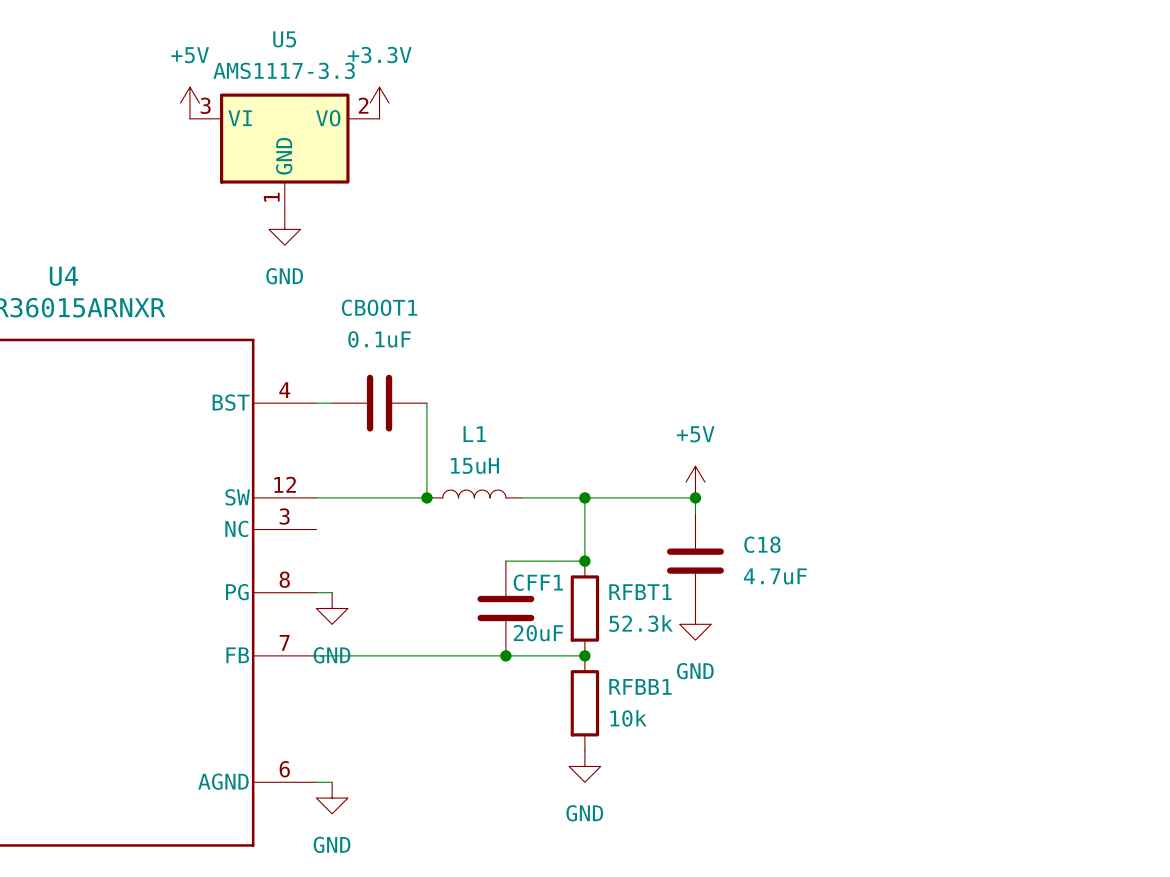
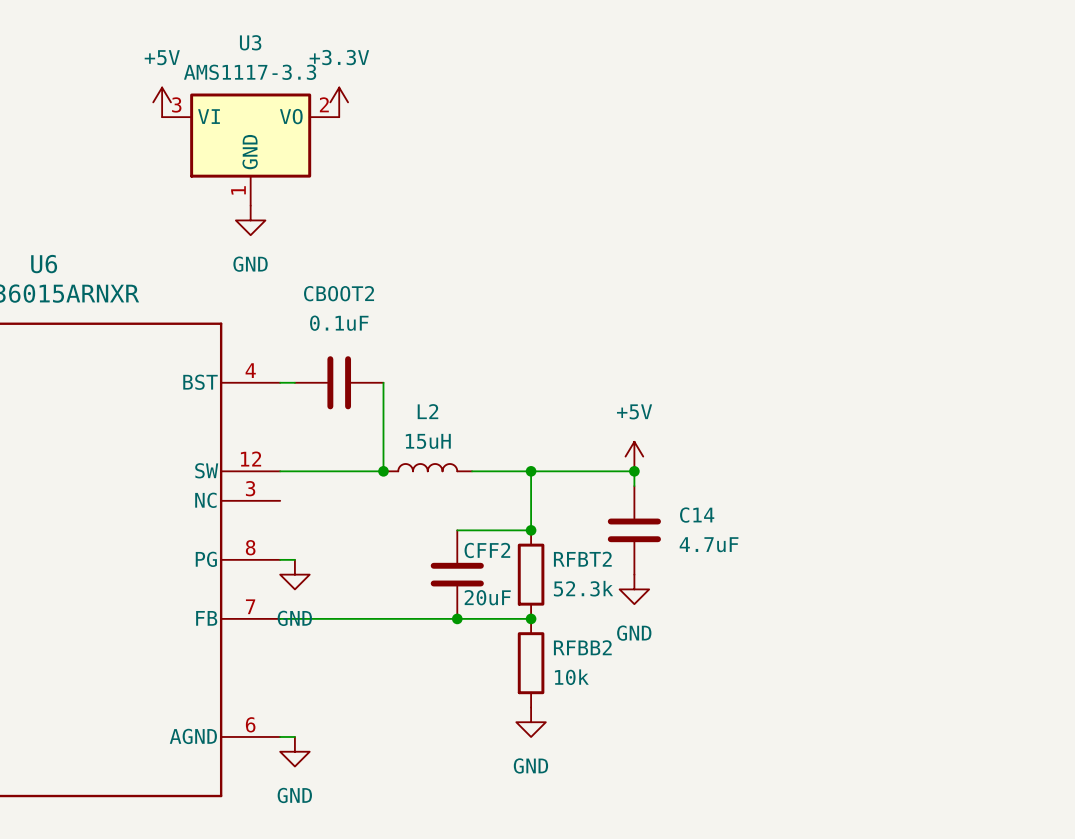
U5 name: U5 (284, 39) -> U3 (250, 42)
U4 name: U4 (63, 276) -> U6 (44, 264)
CBOOT1 name: CBOOT1 (379, 307) -> CBOOT2 (339, 293)
L1 name: L1 (474, 434) -> L2 (427, 411)
C18 name: C18 (762, 544) -> C14 (697, 515)
CFF1 name: CFF1 (538, 582) -> CFF2 (487, 550)
RFBT1 name: RFBT1 (640, 592) -> RFBT2 (582, 559)
RFBB1 name: RFBB1 (640, 686) -> RFBB2 (582, 647)

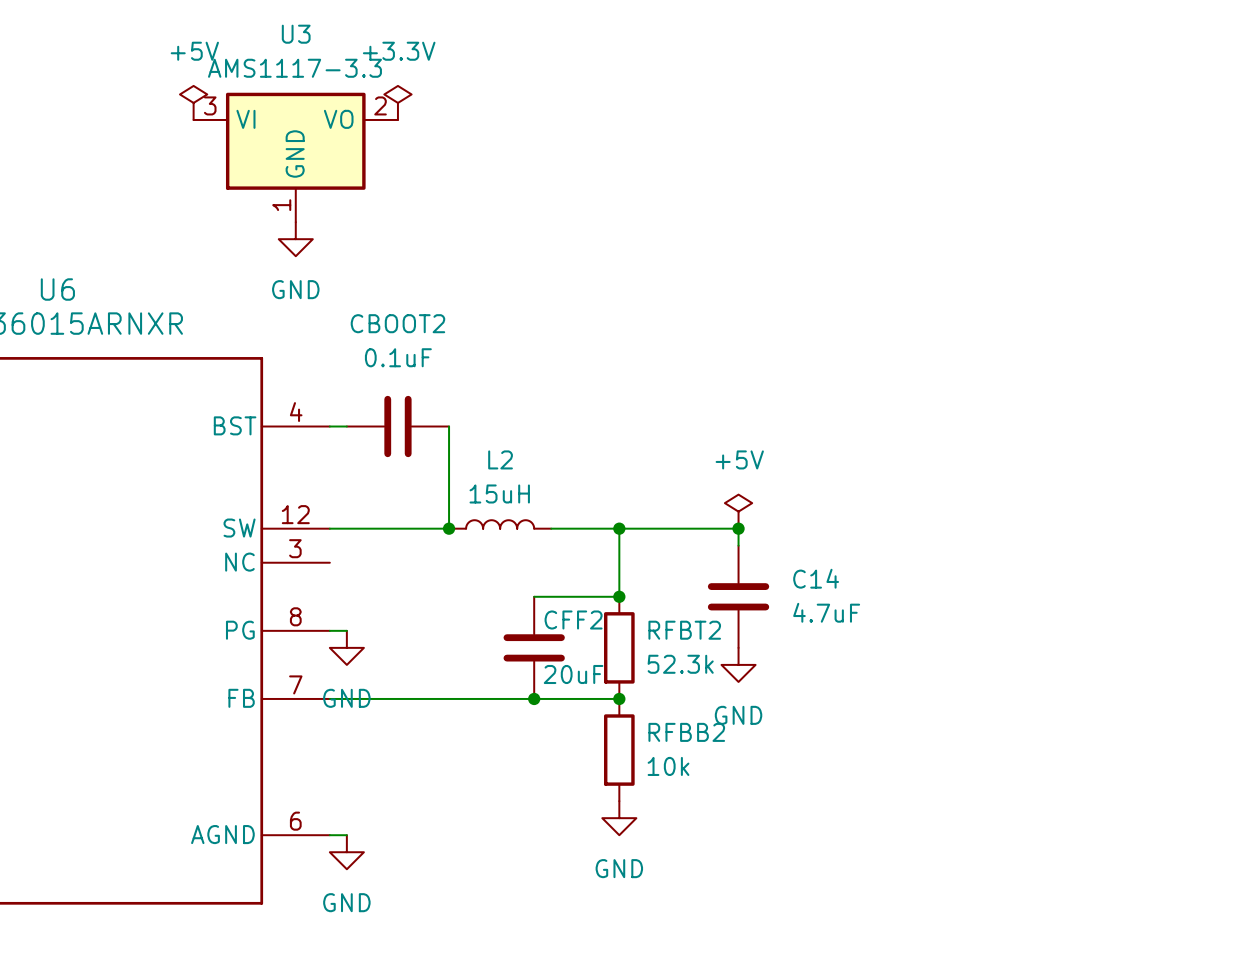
power symbol shape: [153, 87, 171, 118] -> [179, 85, 208, 120]
power symbol shape: [330, 87, 349, 118] -> [384, 85, 412, 120]
power symbol shape: [625, 441, 644, 472] -> [724, 494, 753, 529]

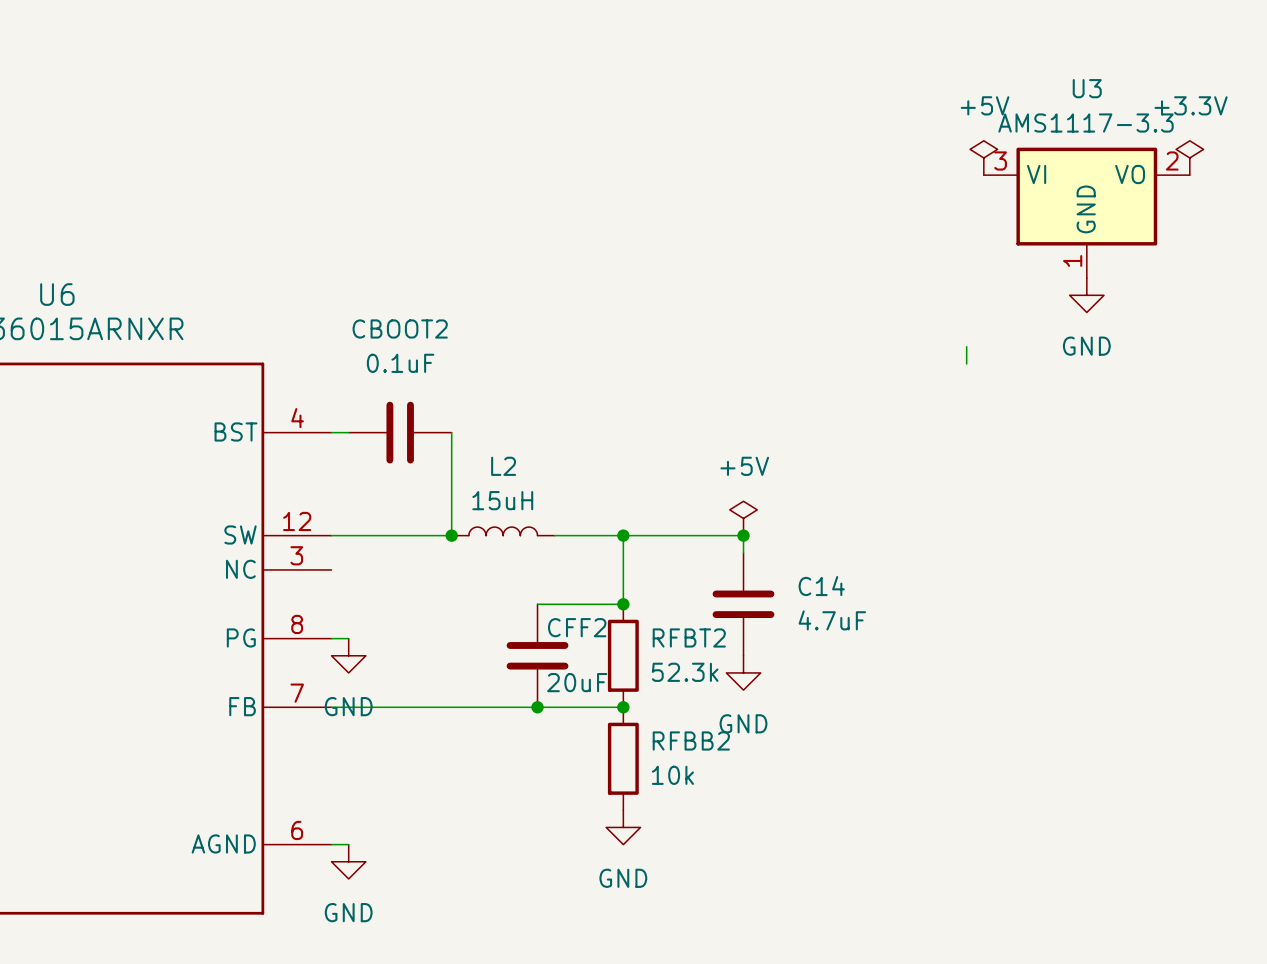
power symbol: +5V (193, 102) -> none
power symbol: +3.3V (397, 102) -> none
power symbol: none -> +5V (983, 157)
power symbol: none -> +3.3V (1189, 157)
U3 position: (295, 157) -> (1086, 212)
power symbol: GND (295, 239) -> none
power symbol: none -> GND (1086, 295)
wire: none -> (966, 346) (966, 363)

